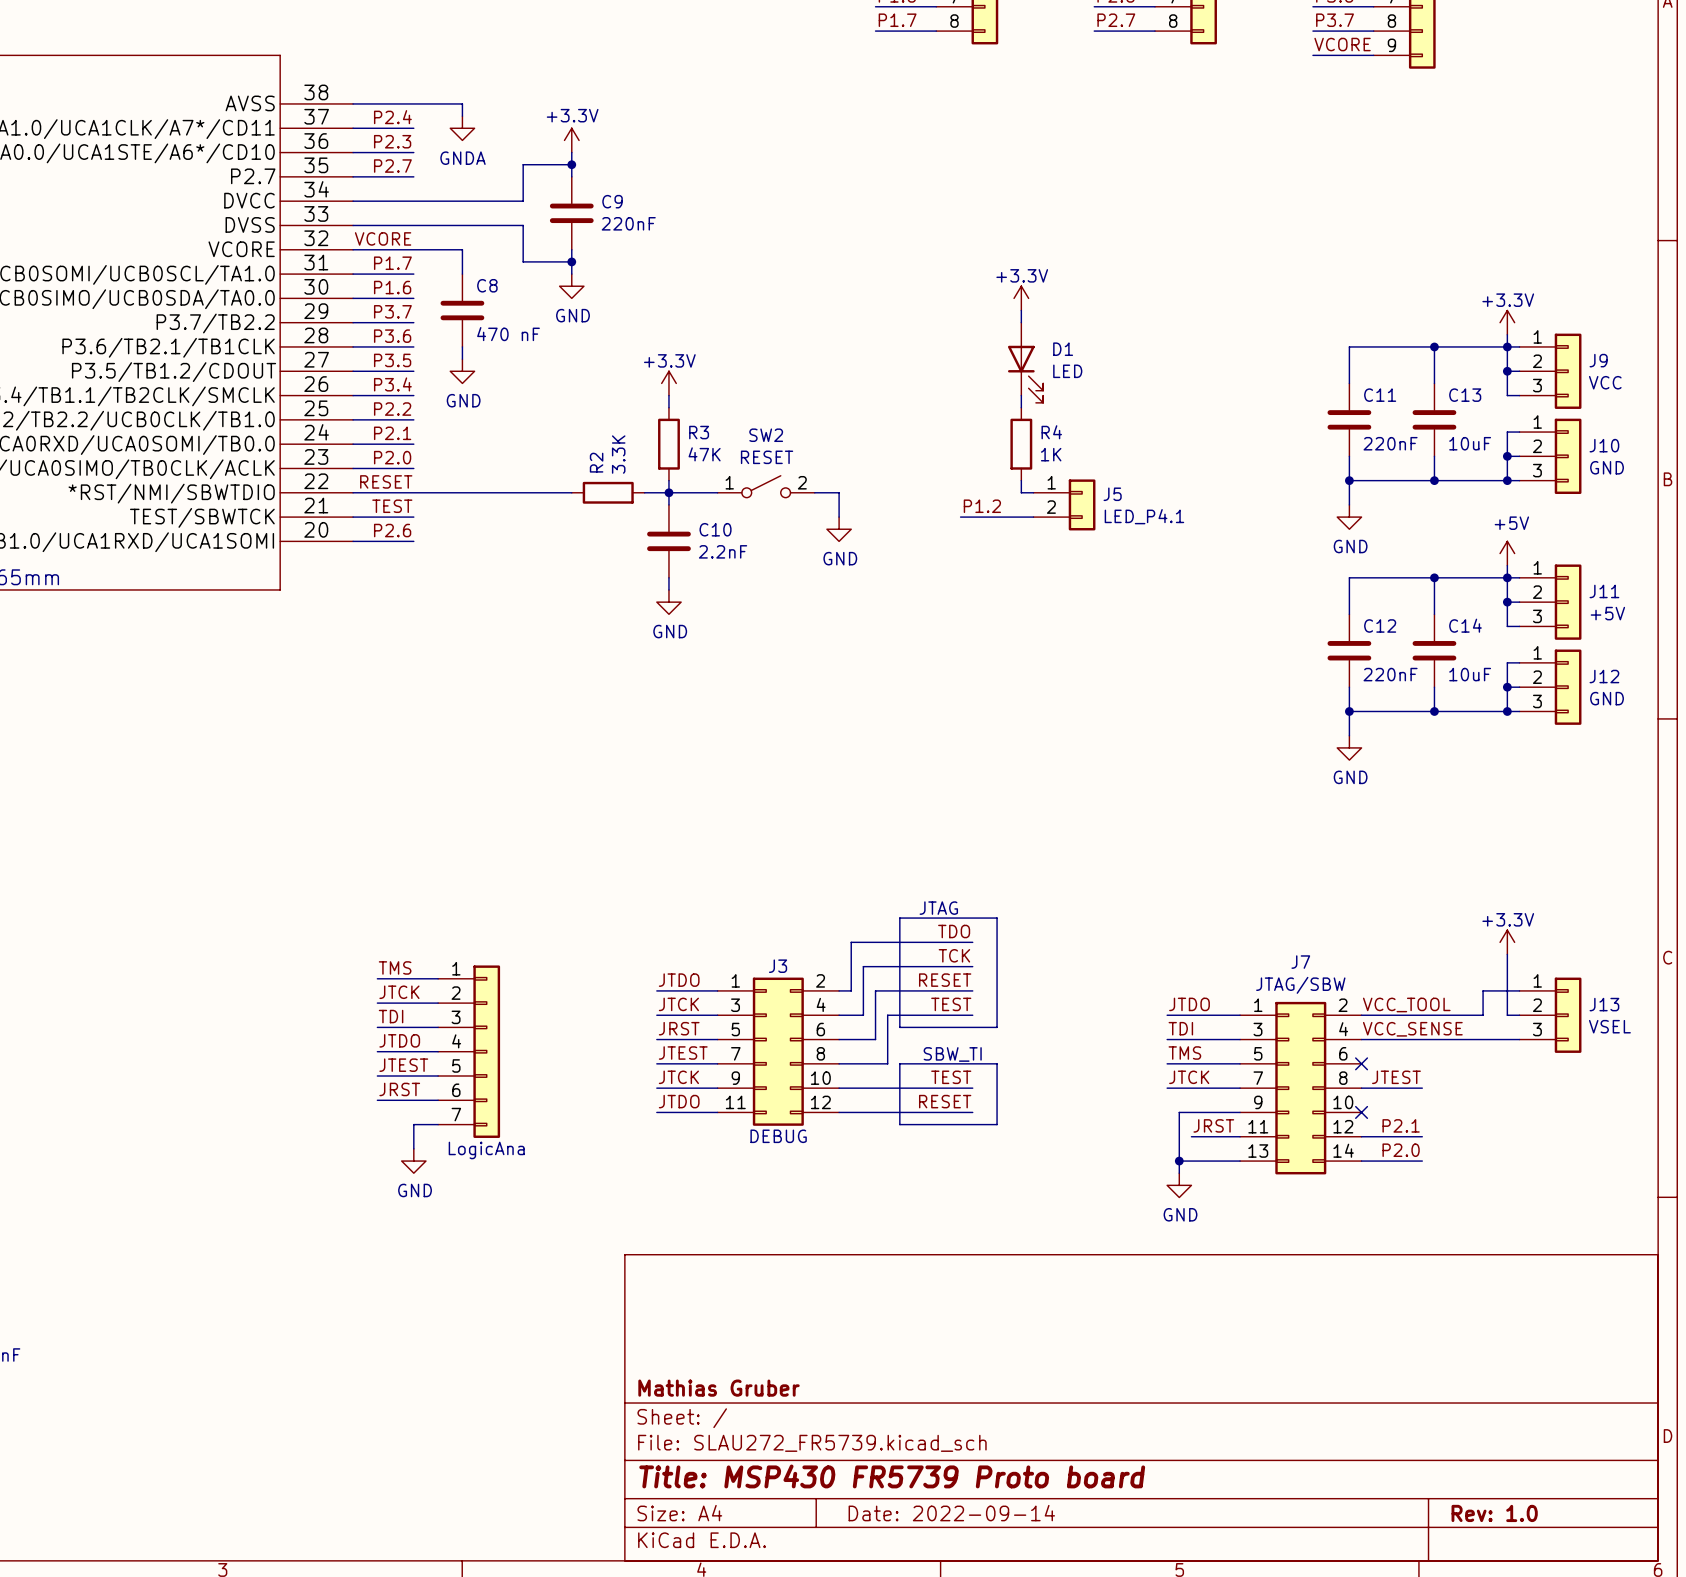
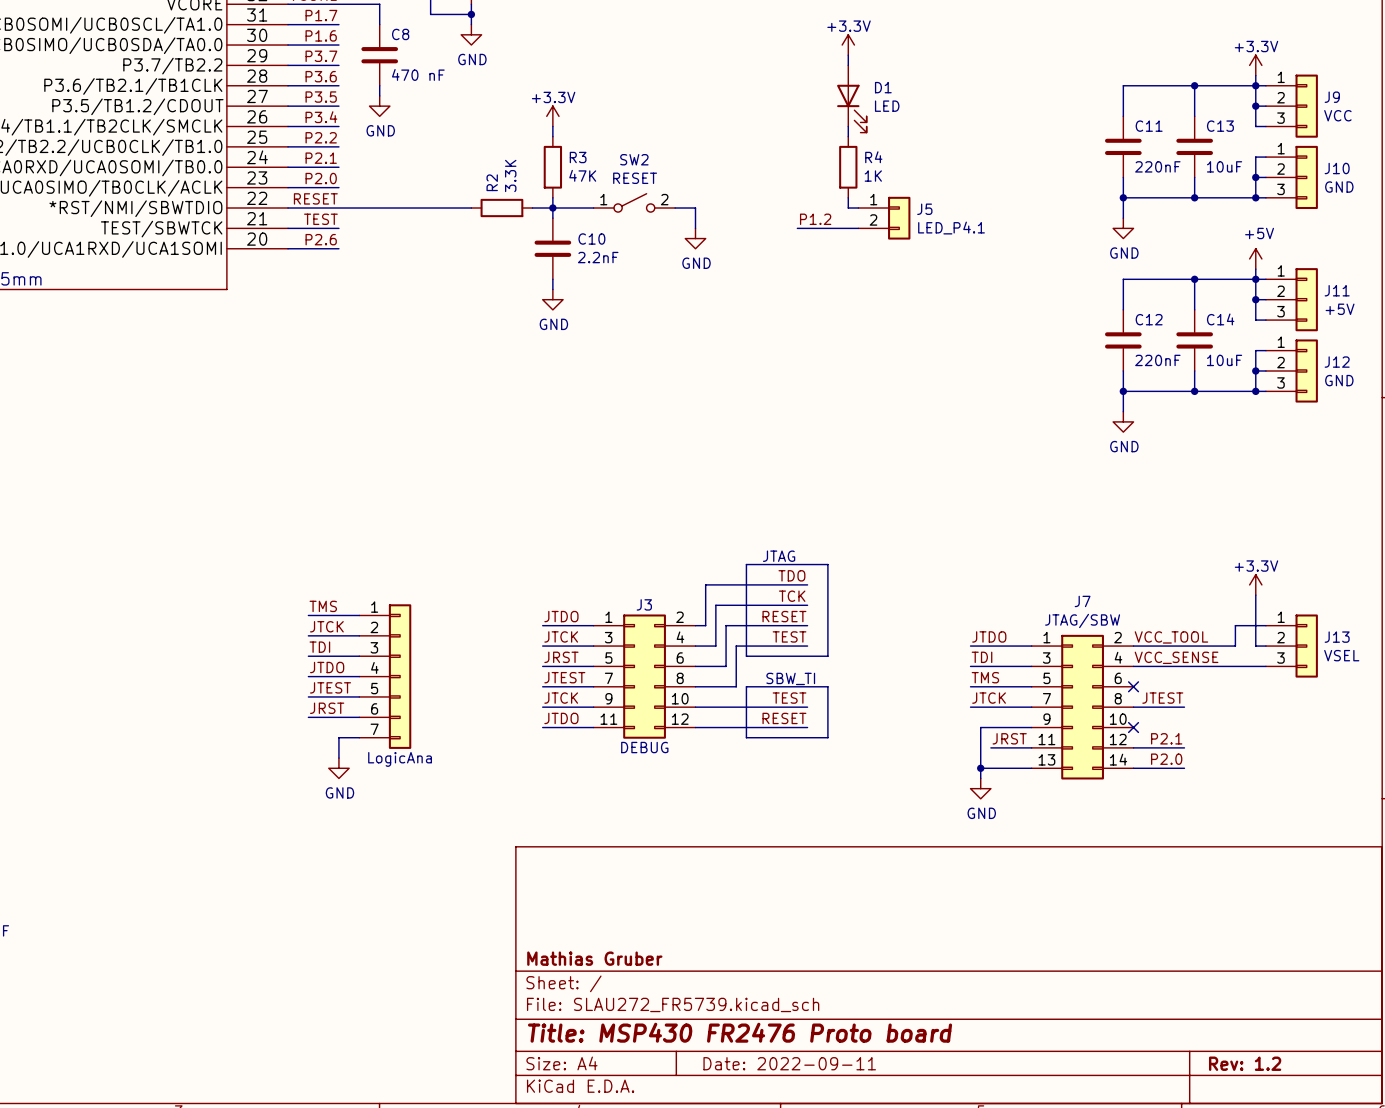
title block: Title: MSP430 FR5739 Proto board (892, 1476) -> Title: MSP430 FR2476 Proto board (740, 1032)
title block: Date: 2022-09-14 (951, 1513) -> Date: 2022-09-11 (789, 1063)
title block: Rev: 1.0 (1494, 1513) -> Rev: 1.2 (1245, 1063)

